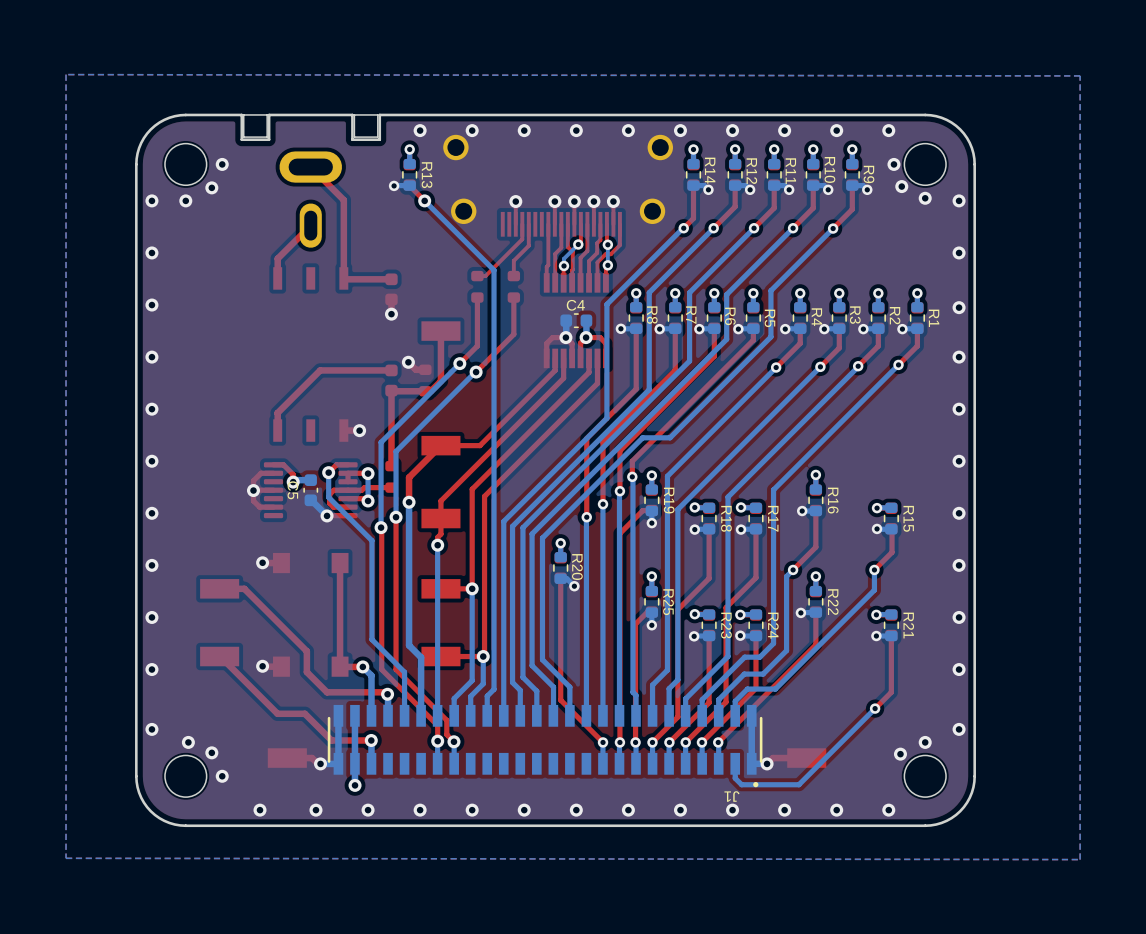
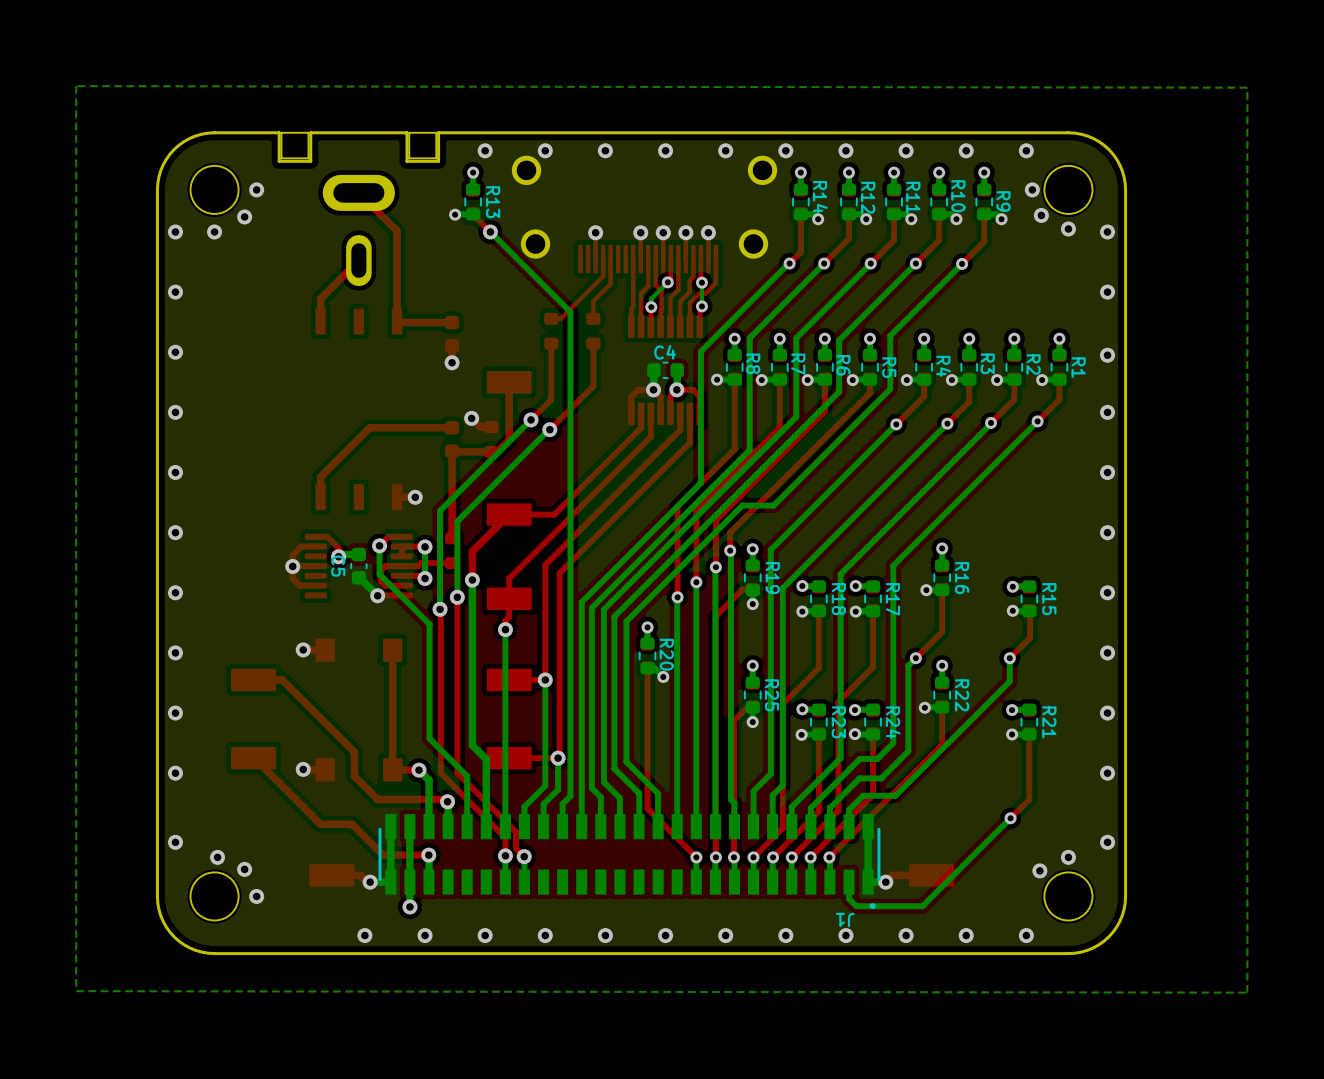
via: (260, 810) -> none

